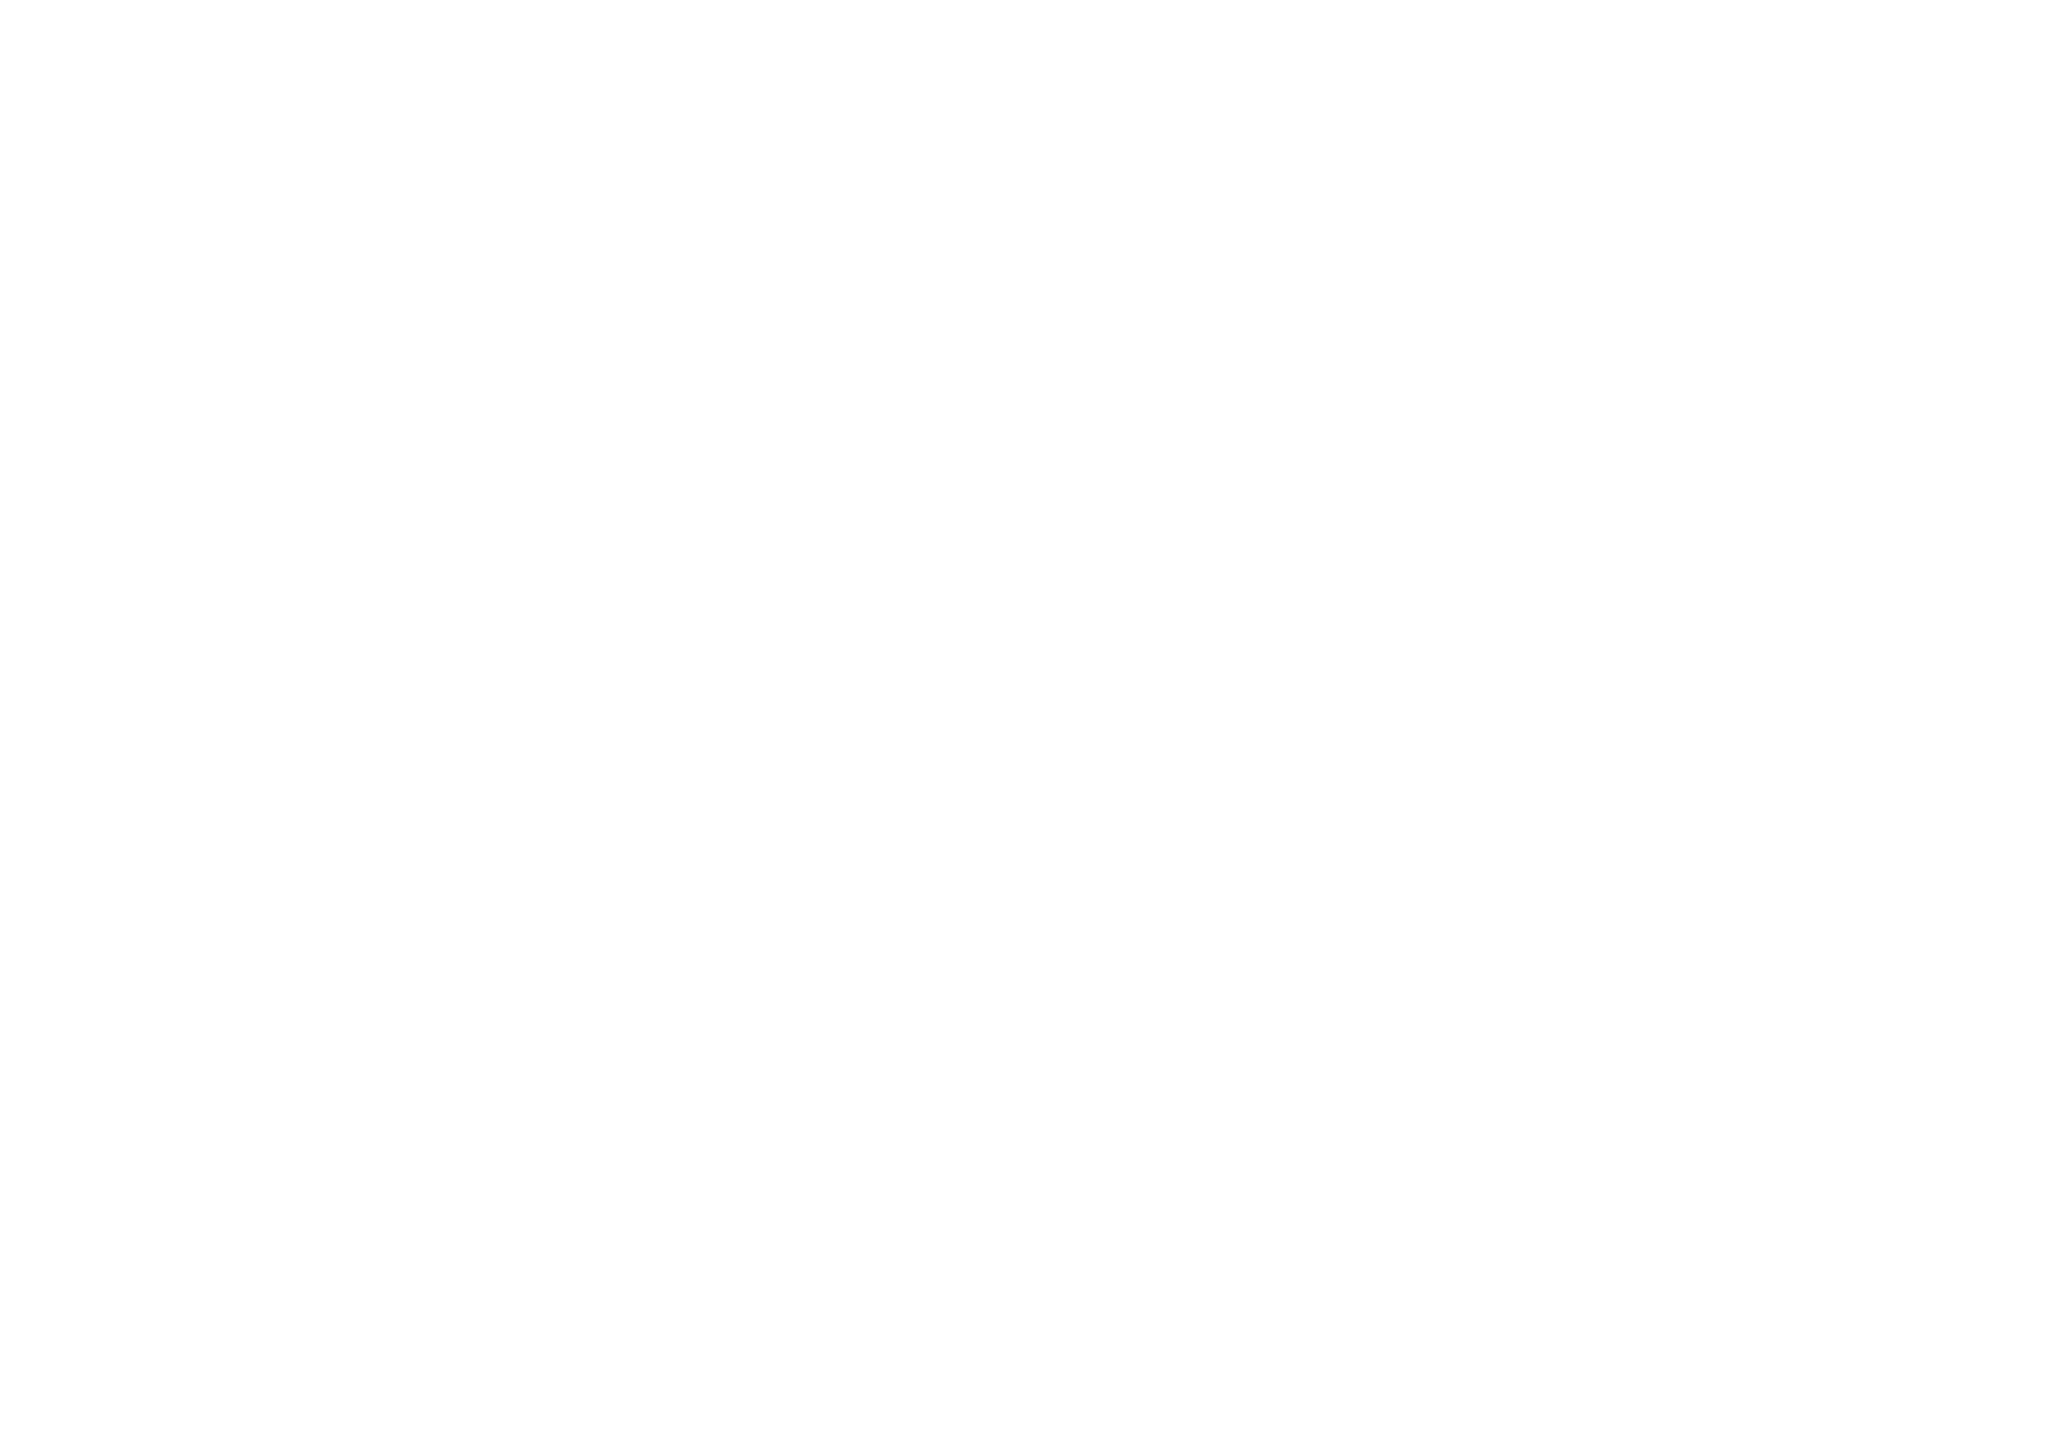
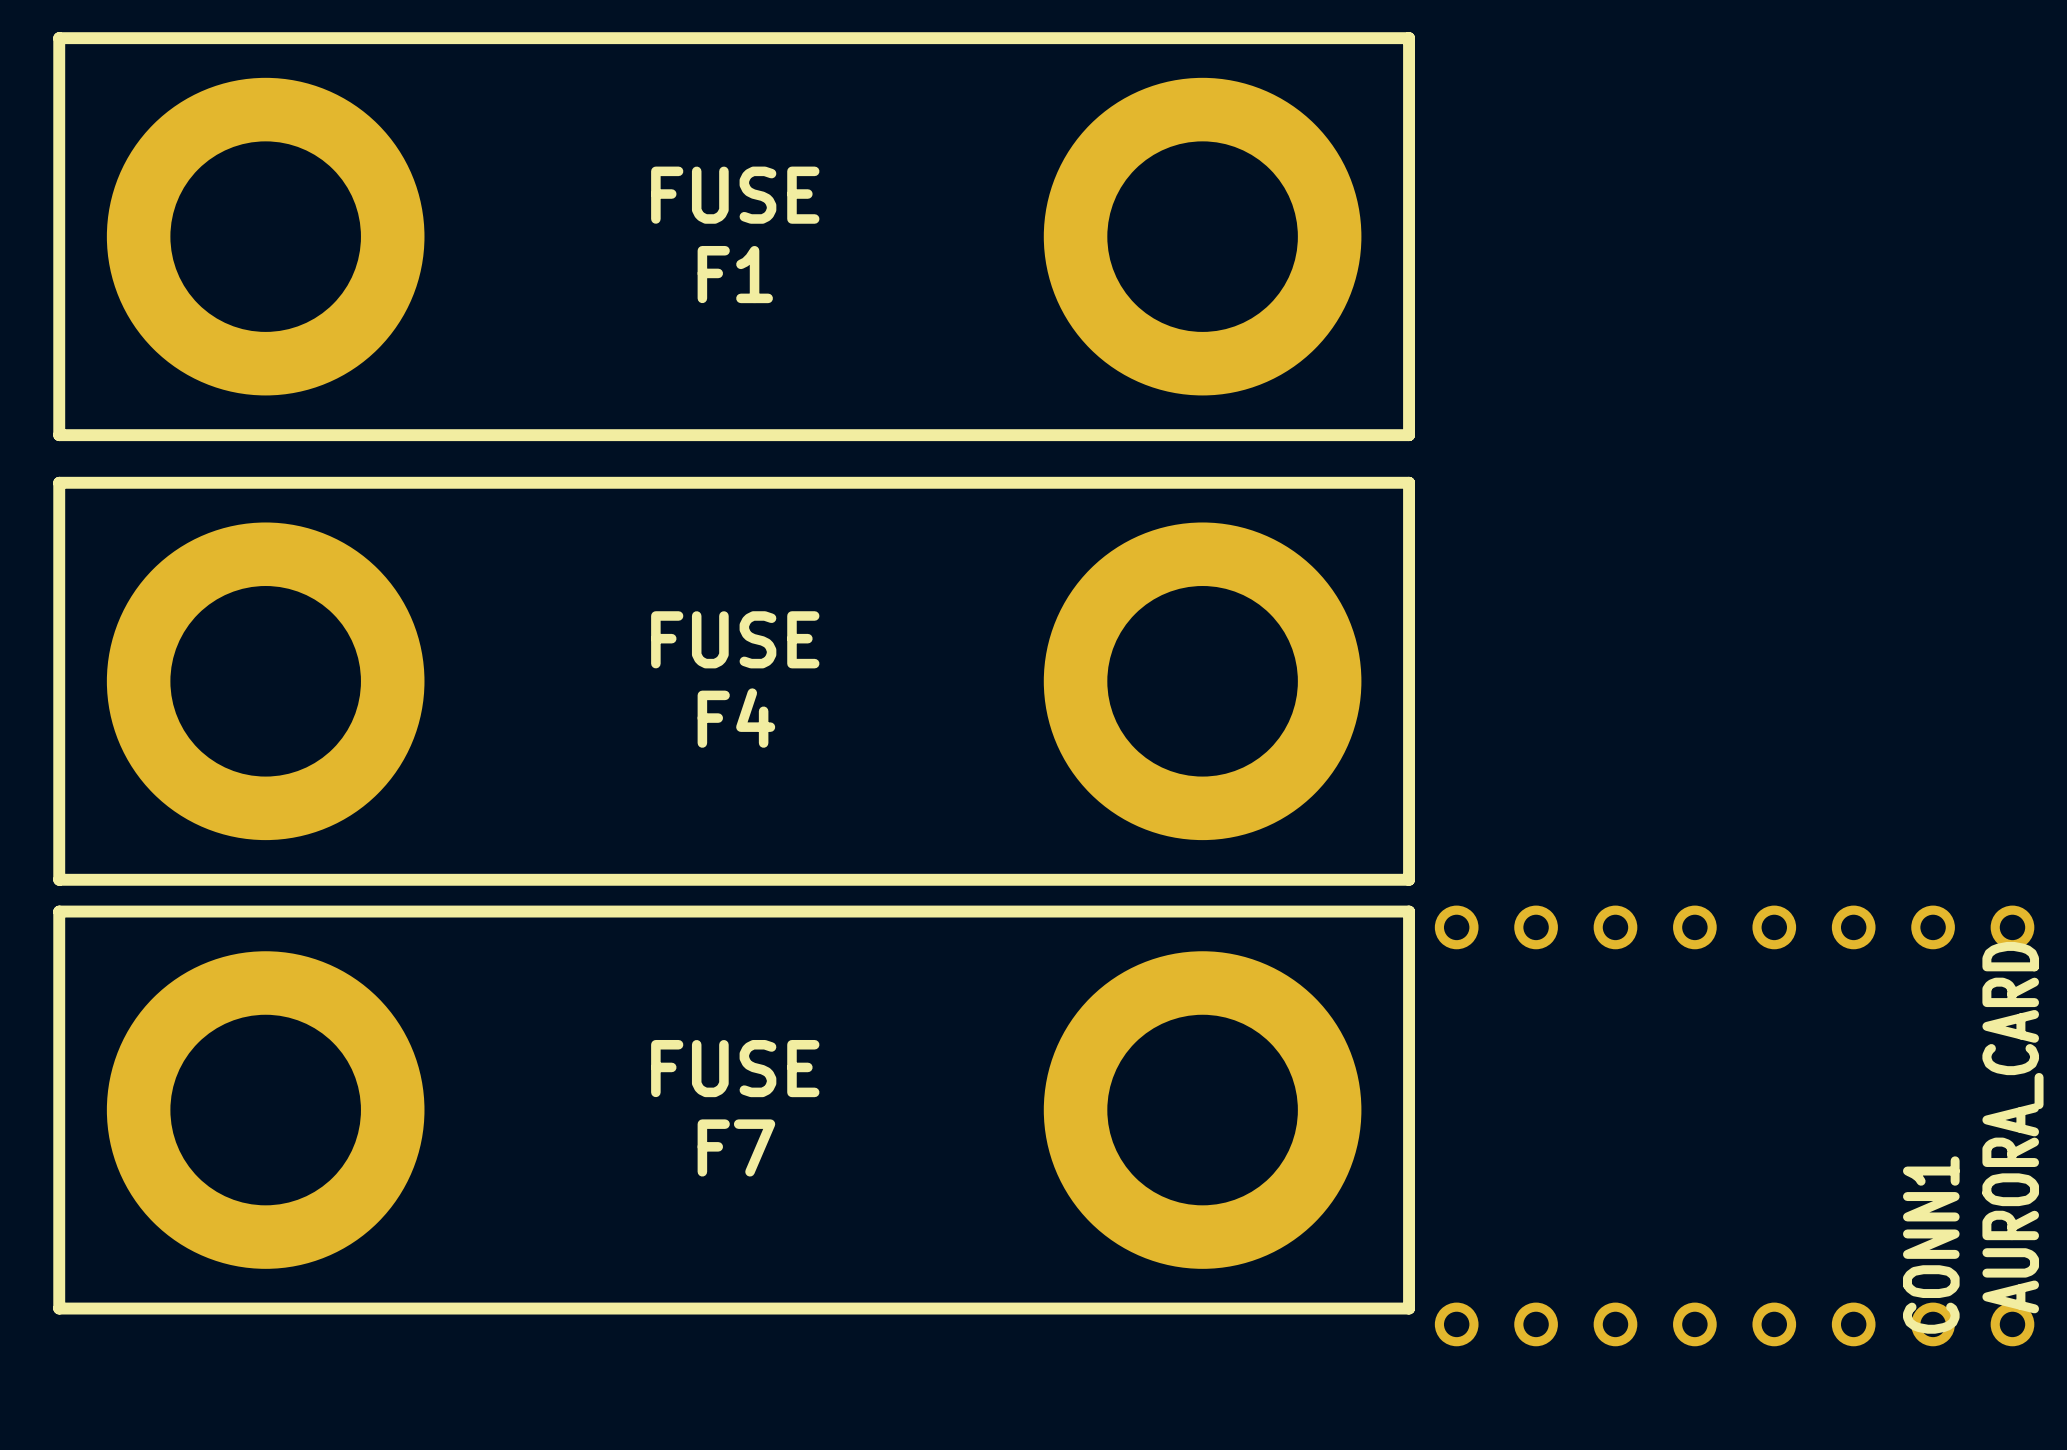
F1: none -> FUSE (734, 236)
F4: none -> FUSE (734, 681)
F7: none -> FUSE (734, 1110)
CONN1: none -> AURORA_CARD (1734, 1125)

